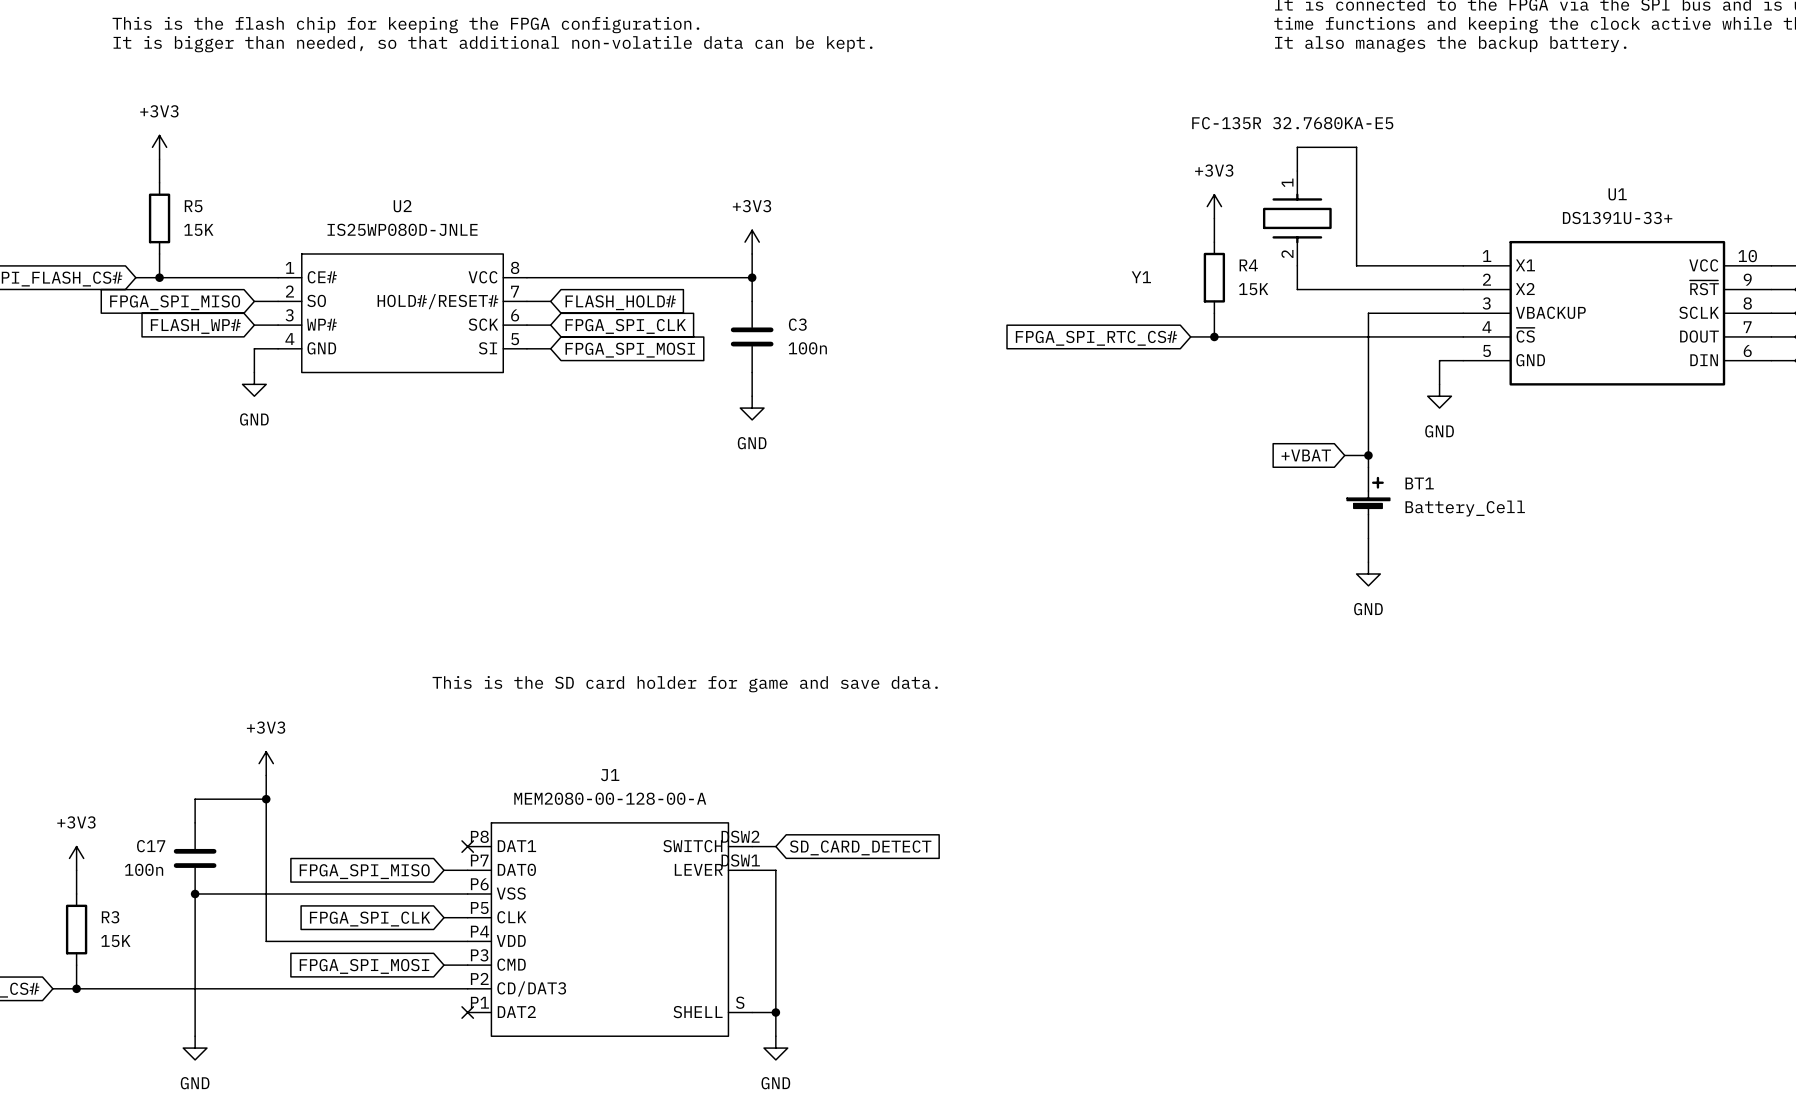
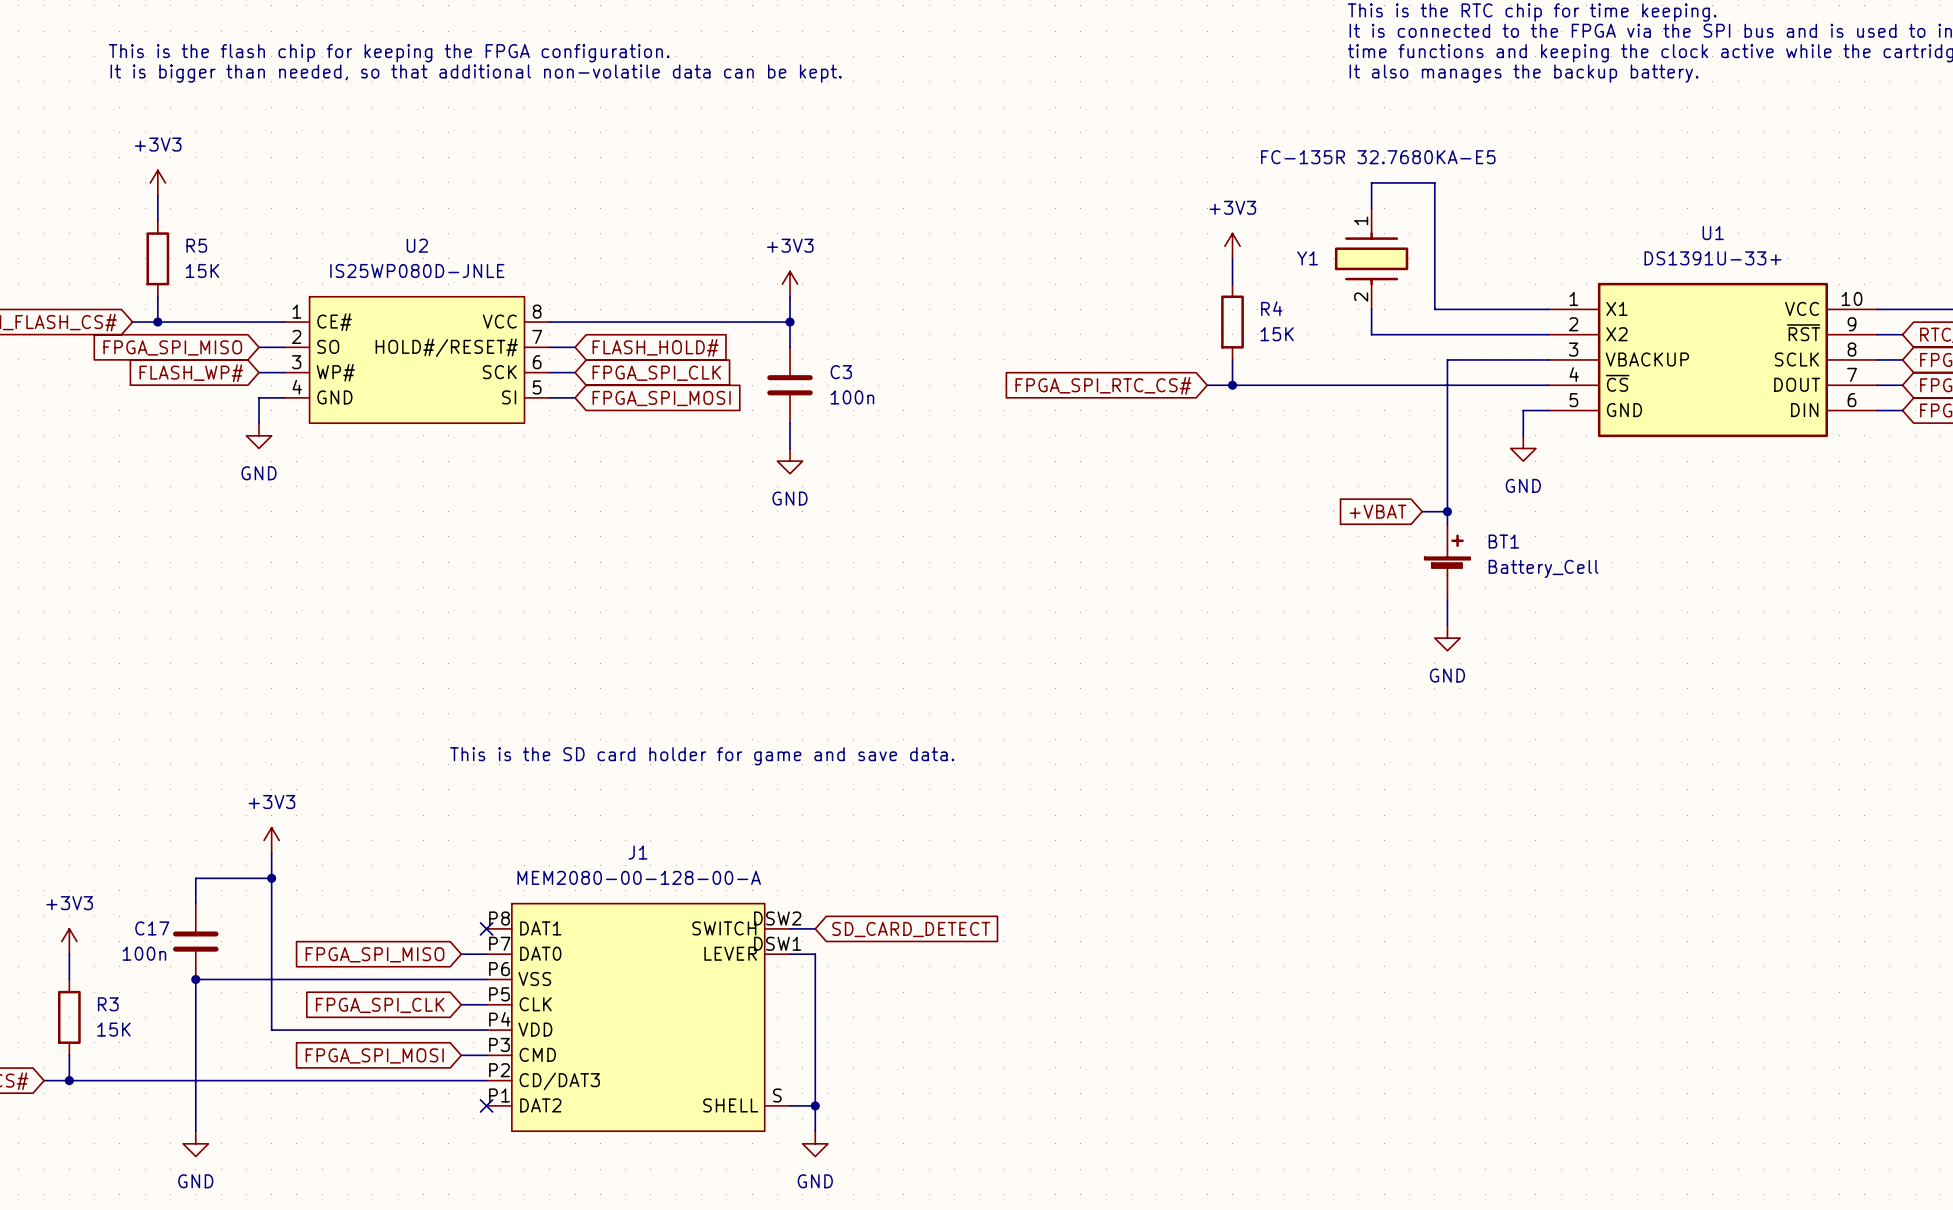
power symbol position: +3V3 (1214, 206) -> +3V3 (1232, 246)
wire: (1214, 218) (1214, 242) -> (1232, 258) (1232, 284)
Y1 name position: Y1 (1141, 277) -> Y1 (1307, 258)
R4 position: (1214, 277) -> (1232, 322)
wire: (1214, 313) (1214, 336) -> (1232, 359) (1232, 385)
wire: none -> (1207, 385) (1257, 385)
junction position: (1214, 336) -> (1232, 385)
global label position: FPGA_SPI_RTC_CS# (1096, 338) -> FPGA_SPI_RTC_CS# (1103, 385)

